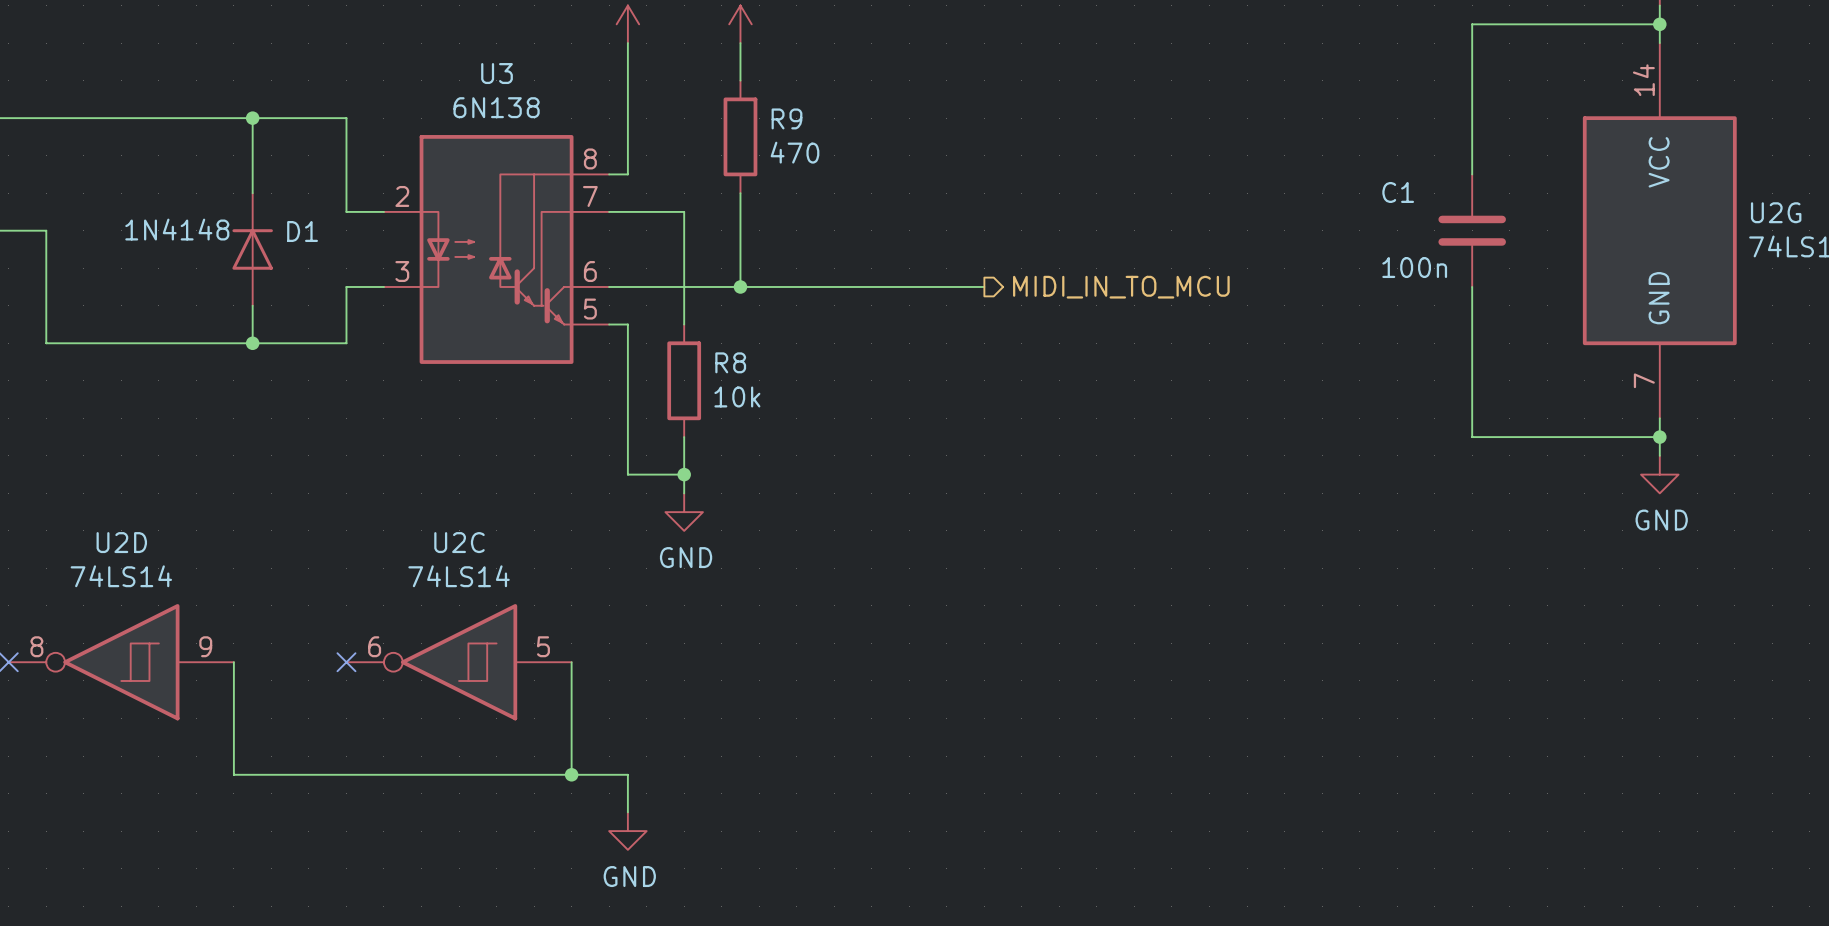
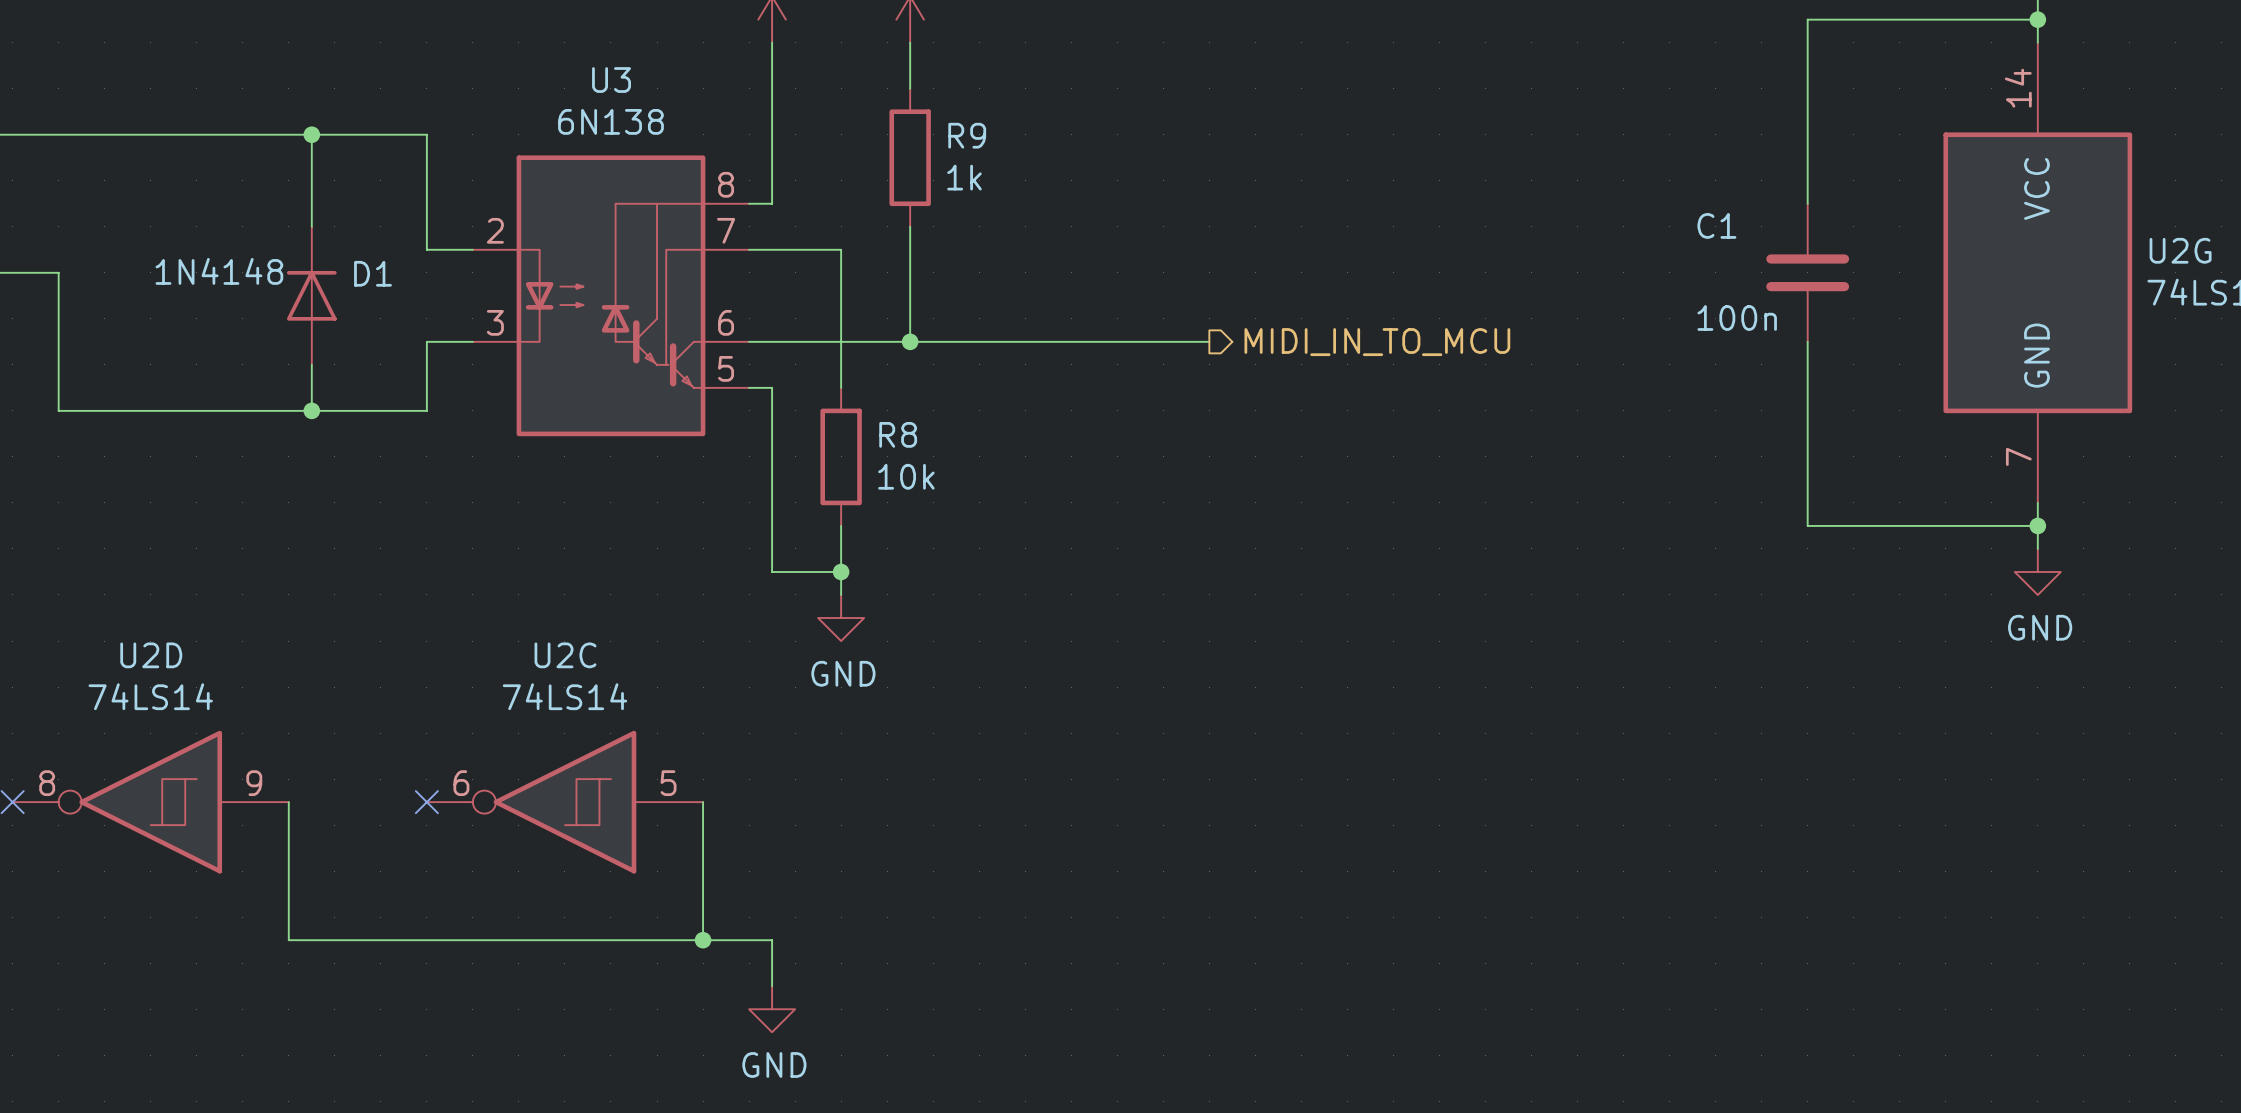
R9 value: 470 (795, 152) -> 1k (964, 177)

